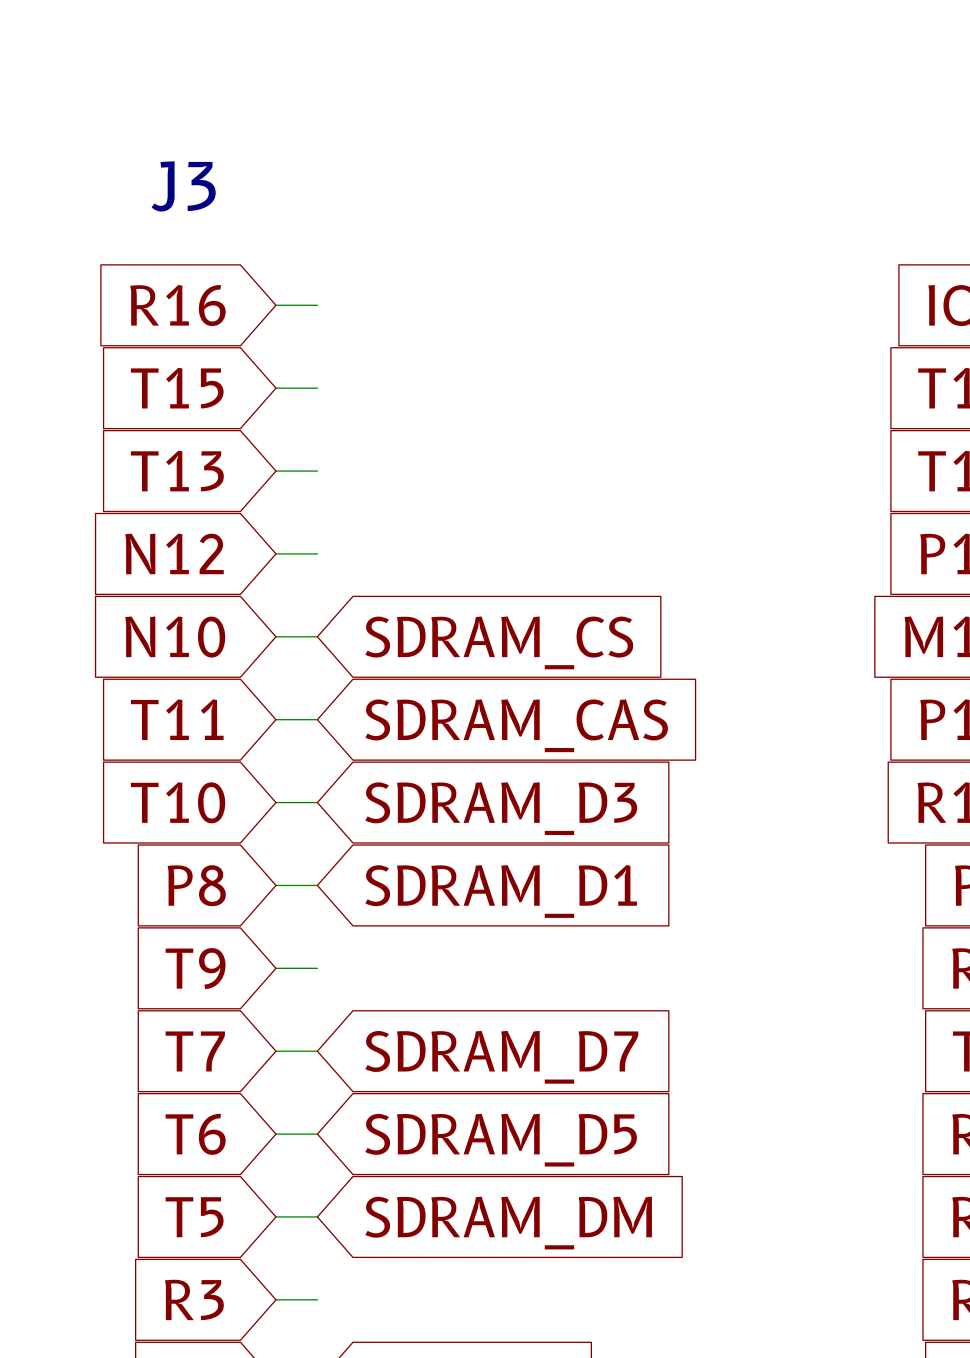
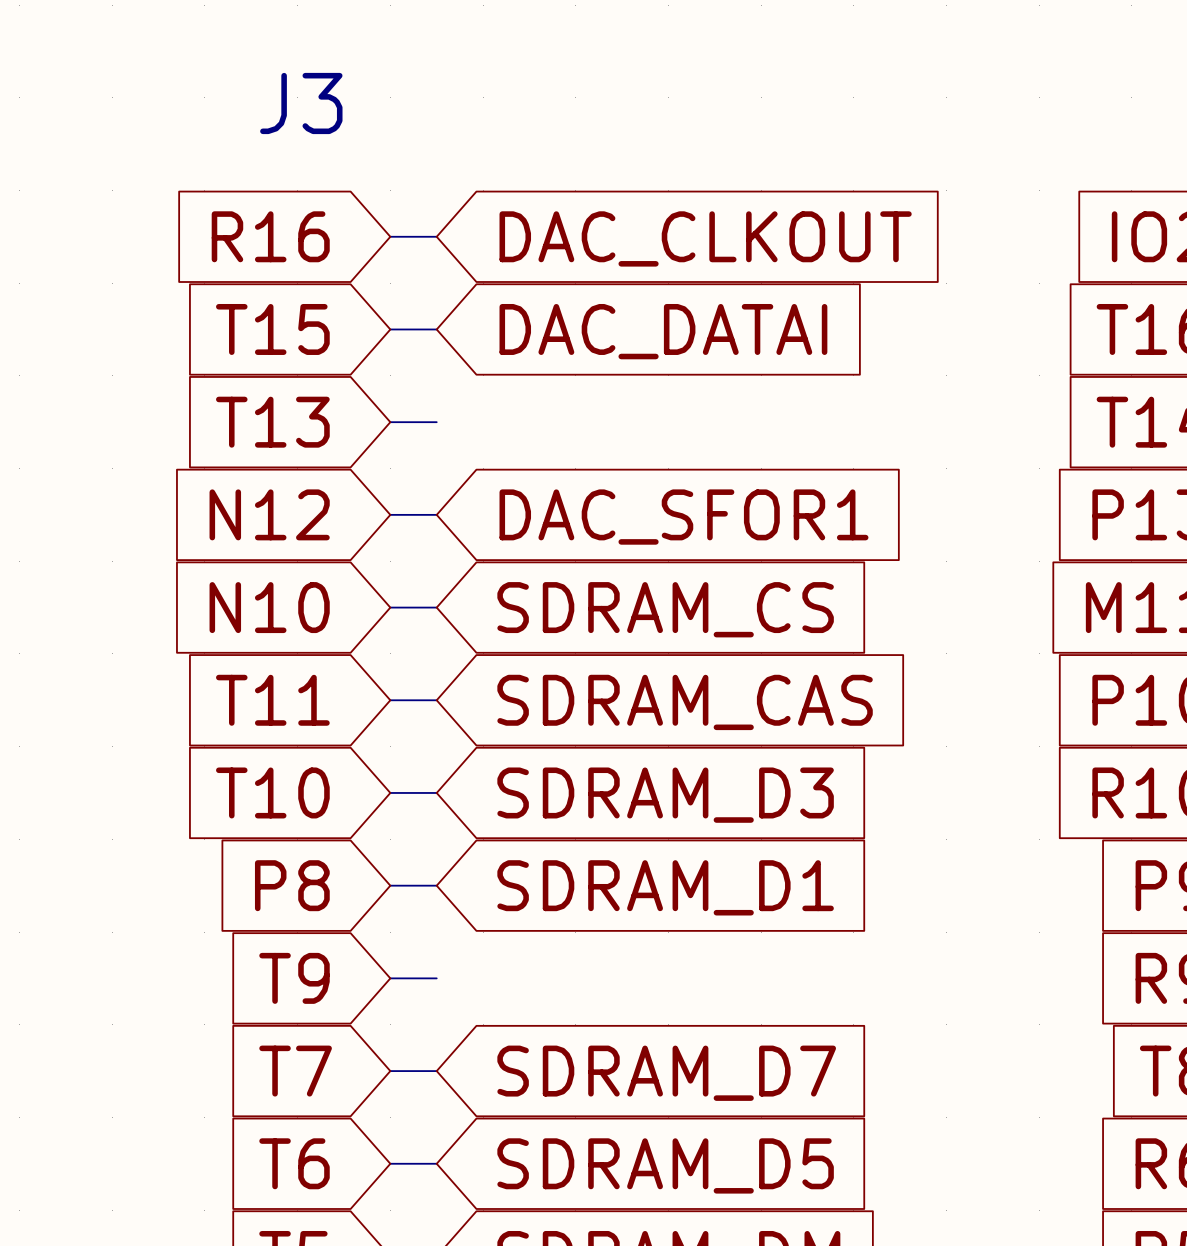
global label: none -> DAC_CLKOUT (705, 238)
global label: none -> DAC_DATAI (663, 331)
global label: none -> DAC_SFOR1 (683, 517)

